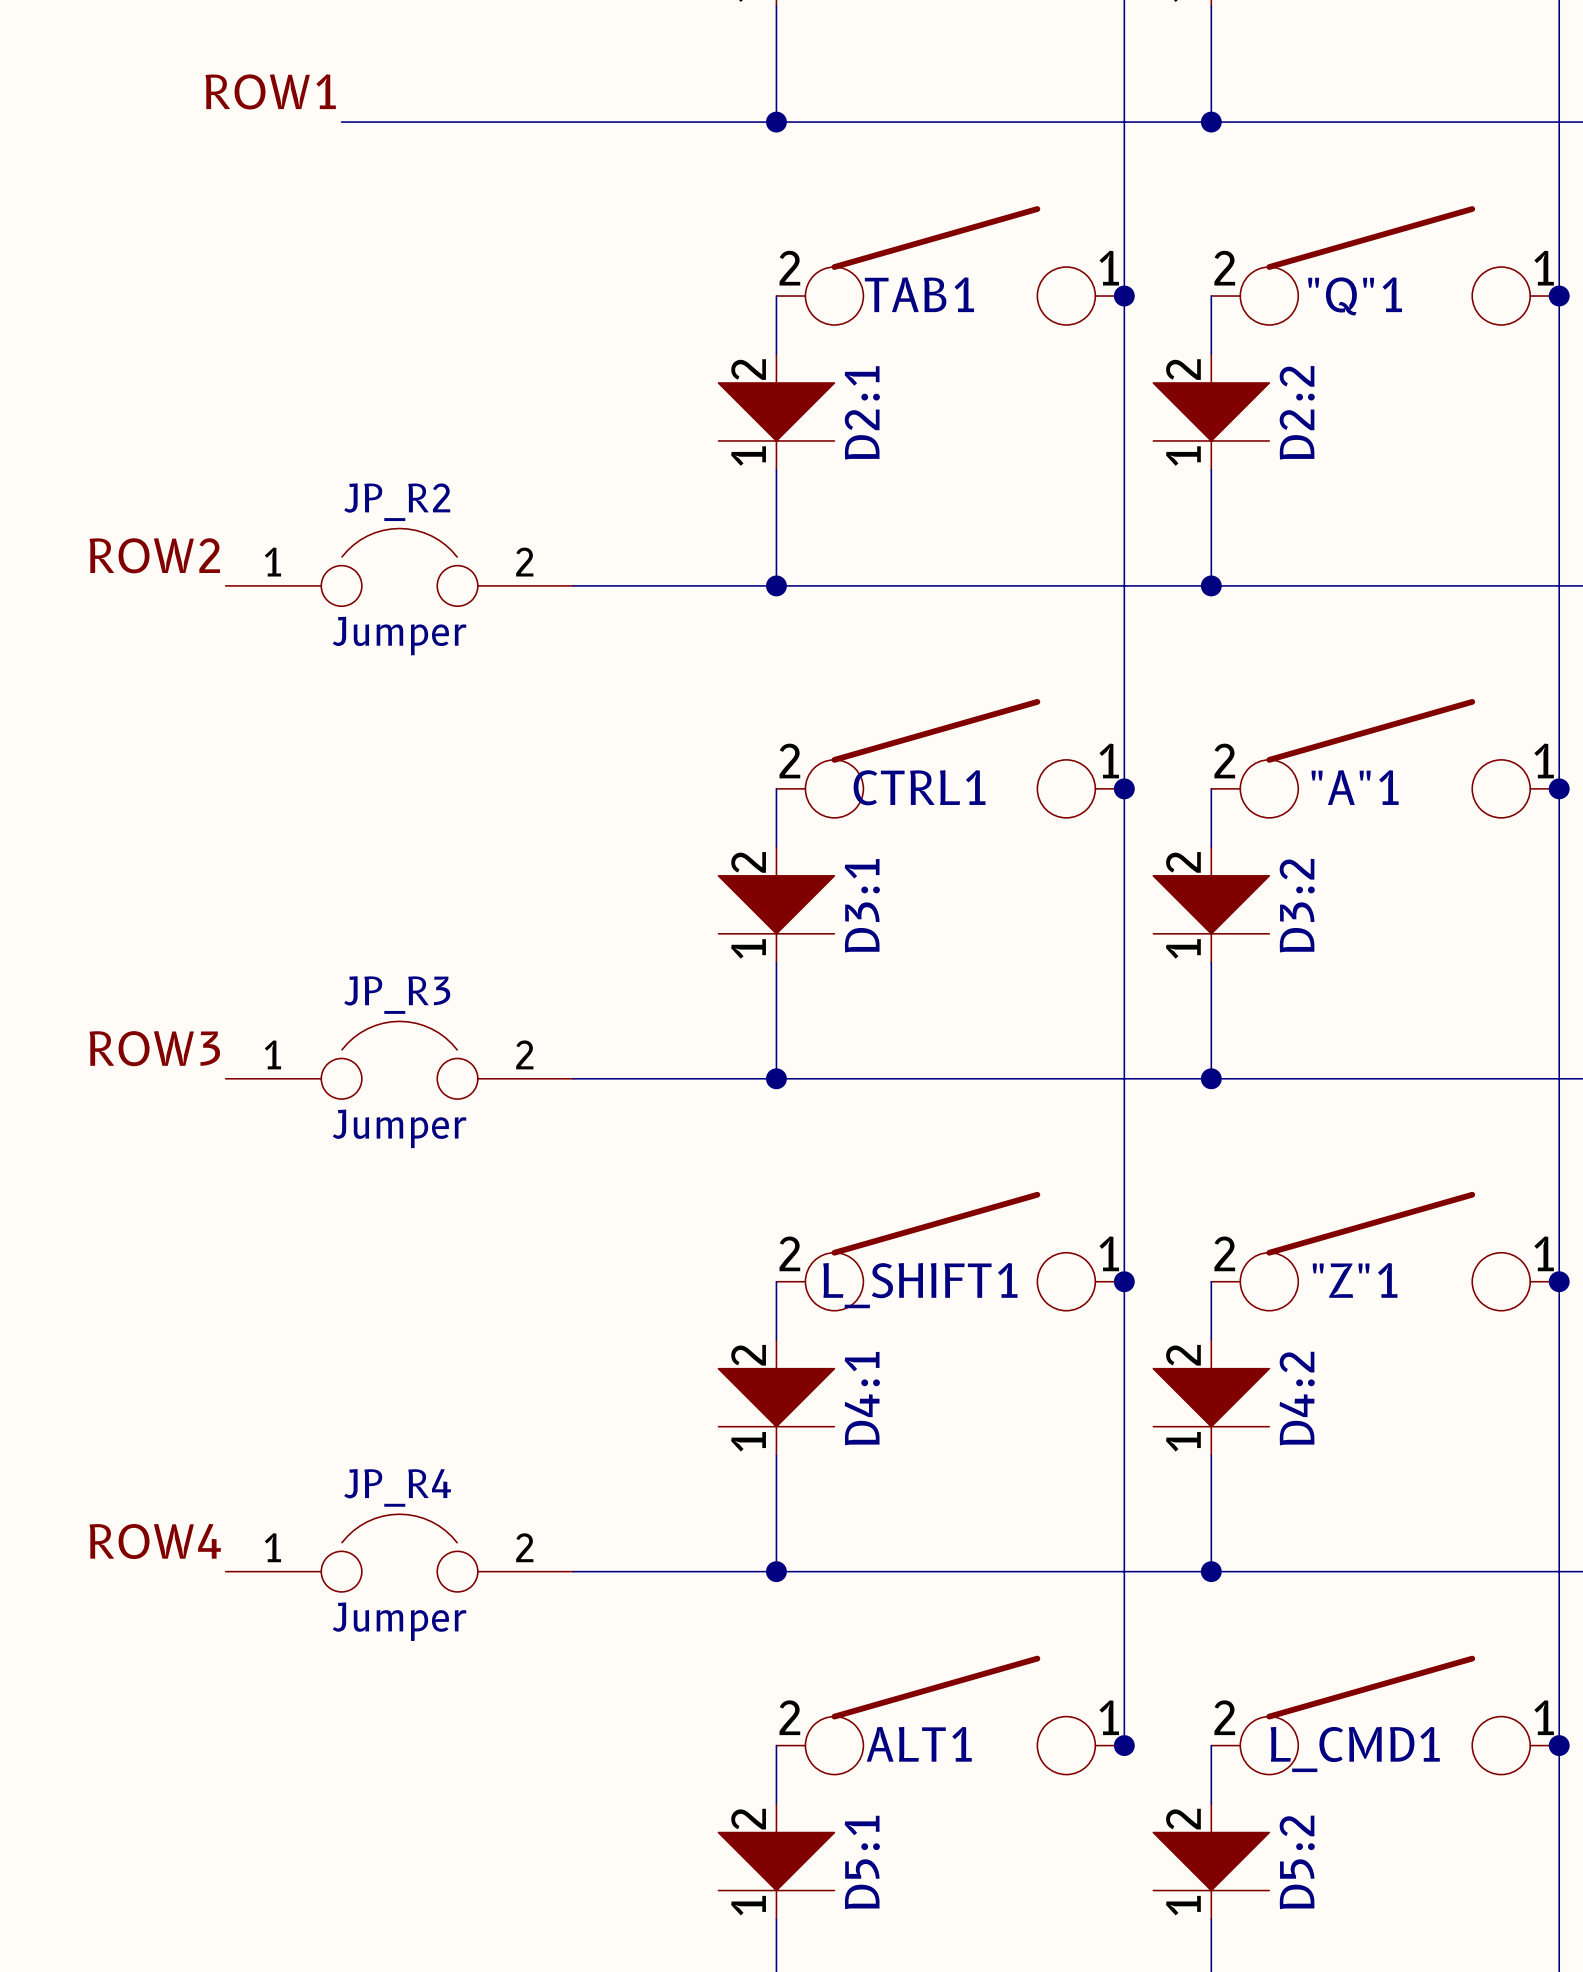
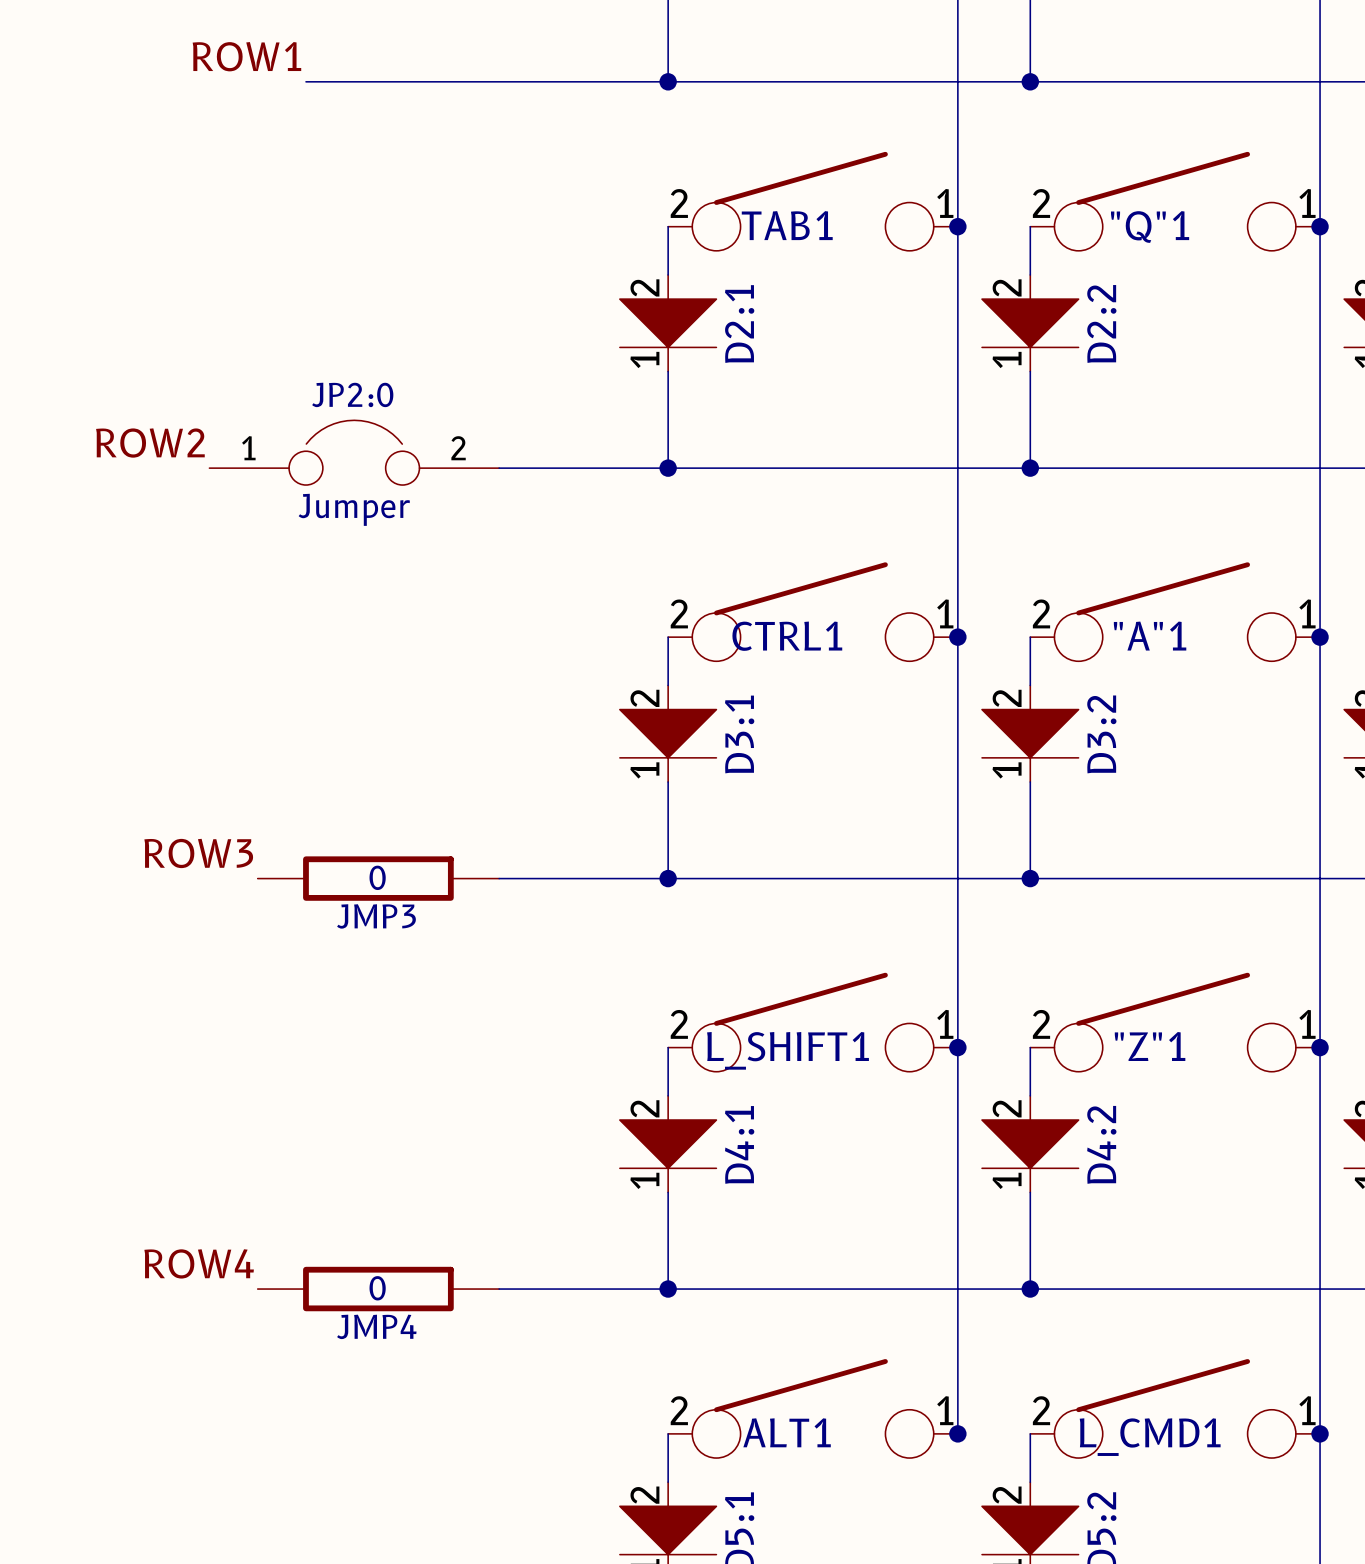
JP_R2 name: JP_R2 (397, 502) -> JP2:0 (352, 394)
label position: ROW3 (154, 1048) -> ROW3 (198, 853)
JP_R3: Jumper (399, 1060) -> none
JMP3: none -> 0 (378, 878)
label position: ROW4 (155, 1541) -> ROW4 (199, 1263)
JP_R4: Jumper (399, 1553) -> none
JMP4: none -> 0 (378, 1289)

